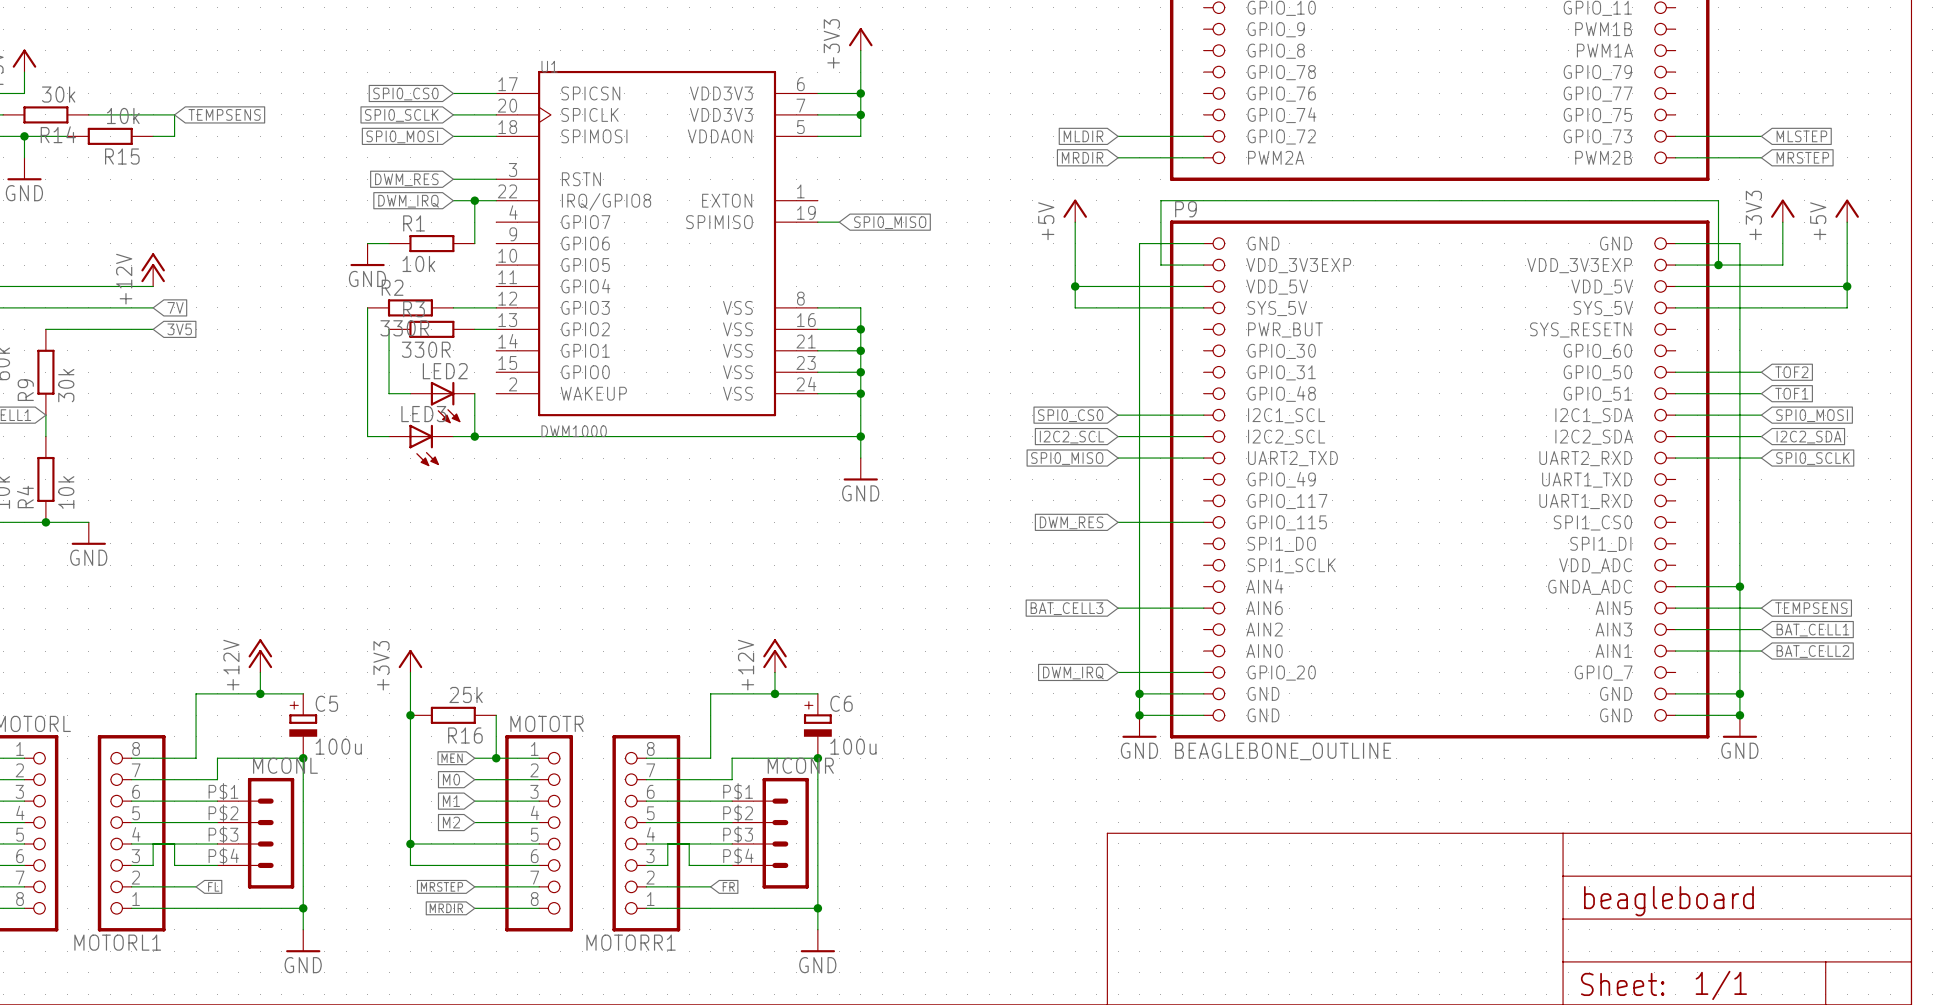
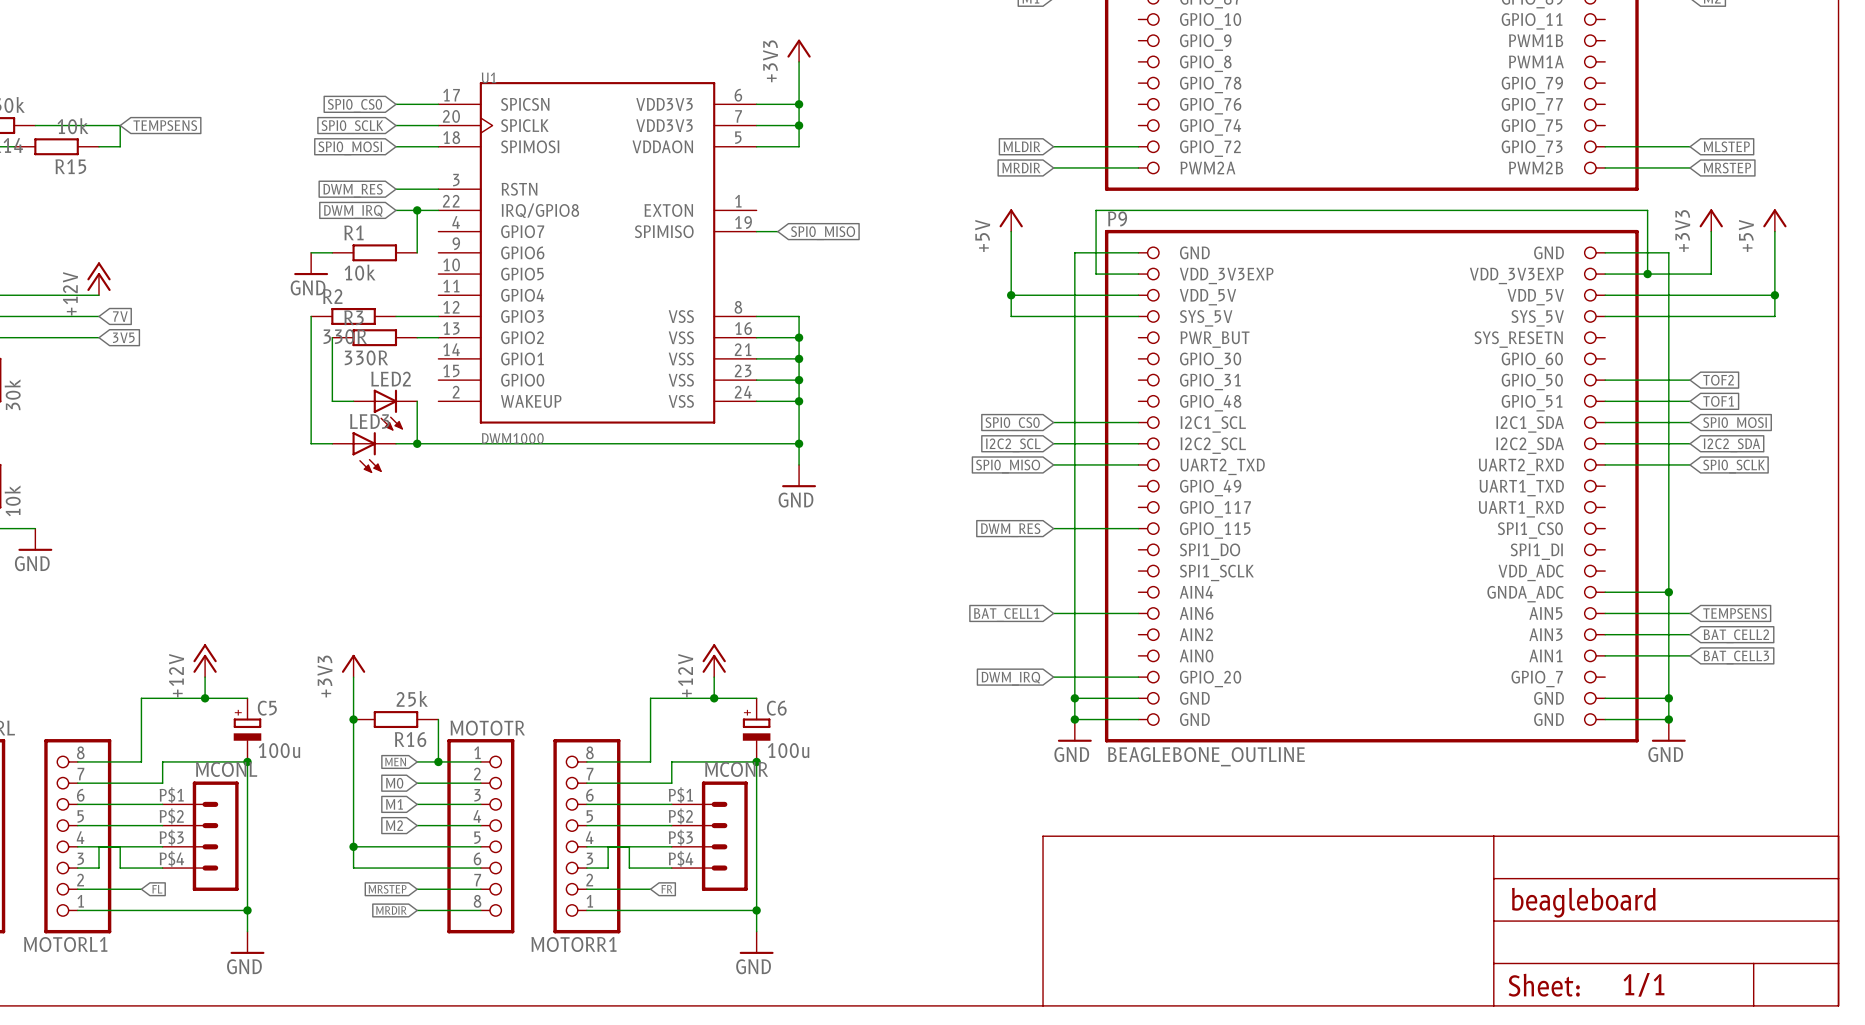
global label: BAT_CELL3 (1066, 608) -> BAT_CELL1 (1006, 615)
global label: BAT_CELL1 (1812, 630) -> BAT_CELL2 (1736, 636)
global label: BAT_CELL2 (1812, 651) -> BAT_CELL3 (1736, 657)

